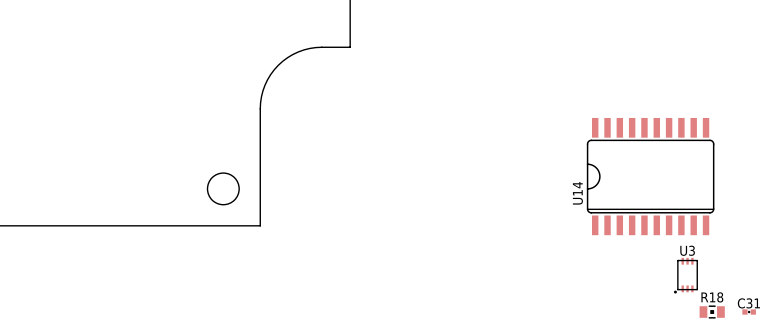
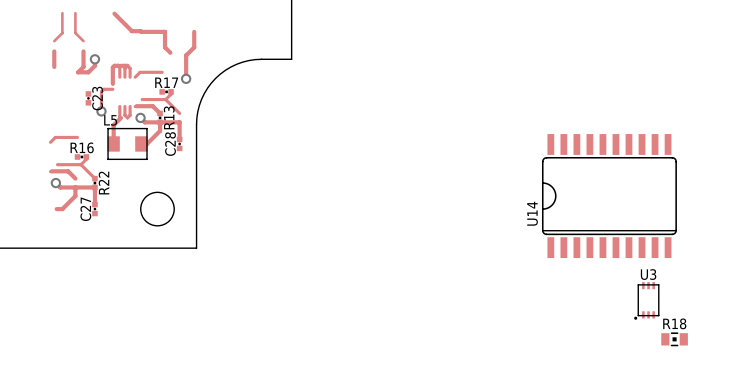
top track: none -> (62, 13) (62, 33) (54, 41)
top track: none -> (75, 13) (75, 33) (83, 41)
top track: none -> (114, 13) (131, 31) (165, 31) (165, 47) (170, 52)
top track: none -> (194, 31) (194, 47) (186, 55) (186, 78)
top track: none -> (54, 51) (54, 66)
top track: none -> (83, 51) (83, 66) (78, 72) (88, 72) (94, 65) (94, 59)
via: none -> (94, 59)
top track: none -> (127, 65) (119, 66)
top track: none -> (127, 65) (130, 68) (130, 77)
top track: none -> (127, 65) (124, 68) (124, 77)
top track: none -> (119, 66) (114, 65) (112, 67) (112, 84)
top track: none -> (119, 66) (119, 77)
top track: none -> (162, 72) (140, 72) (135, 77)
via: none -> (186, 78)
top track: none -> (112, 89) (104, 89) (101, 91) (101, 111)
R17: none -> (166, 91)
top track: none -> (171, 91) (165, 99)
C23: none -> (88, 98)
top track: none -> (142, 99) (165, 99)
top track: none -> (165, 99) (179, 113)
top track: none -> (119, 106) (121, 117) (113, 125) (113, 143)
top track: none -> (124, 106) (124, 115) (127, 117) (130, 115) (130, 106)
top track: none -> (135, 106) (152, 106) (160, 113)
via: none -> (101, 111)
top track: none -> (140, 117) (144, 122) (179, 122) (179, 139)
via: none -> (140, 117)
R13: none -> (160, 117)
top track: none -> (160, 122) (160, 130) (147, 143) (141, 143)
top track: none -> (77, 137) (55, 137) (50, 142)
L5: none -> (127, 143)
C28: none -> (179, 143)
R16: none -> (81, 156)
top track: none -> (86, 156) (81, 164)
top track: none -> (57, 164) (81, 164)
top track: none -> (81, 164) (94, 178)
top track: none -> (50, 171) (68, 171) (75, 178)
top track: none -> (55, 183) (60, 187) (94, 187) (94, 204)
via: none -> (55, 183)
R22: none -> (94, 183)
top track: none -> (75, 187) (75, 196) (62, 209) (56, 209)
C27: none -> (94, 209)
C31: (749, 312) -> none

